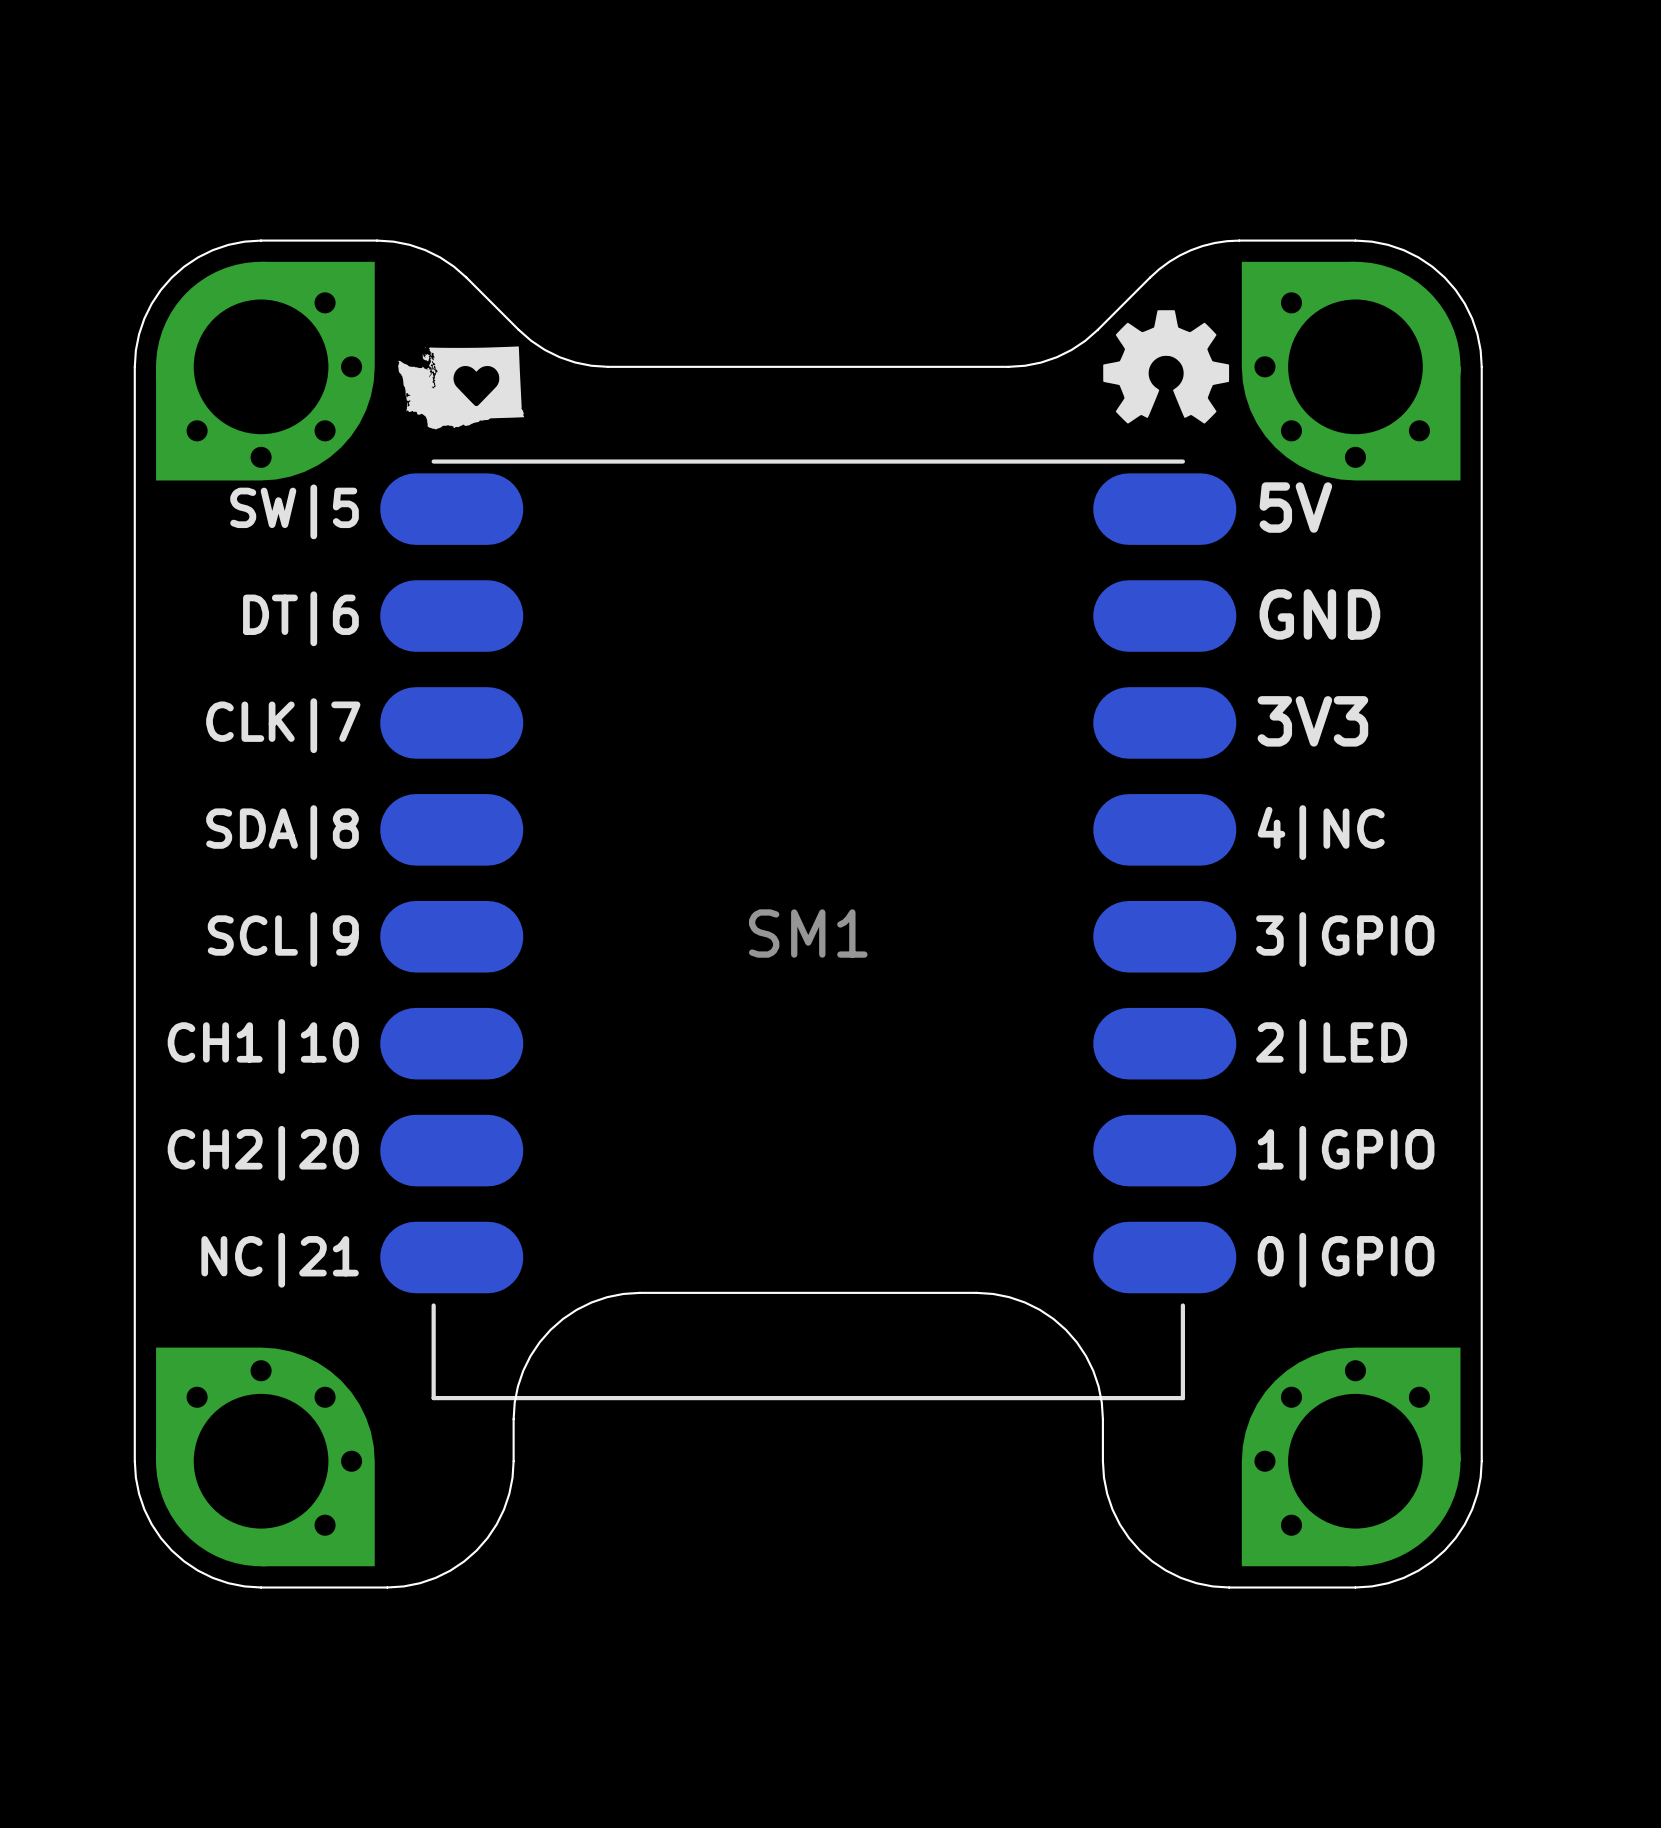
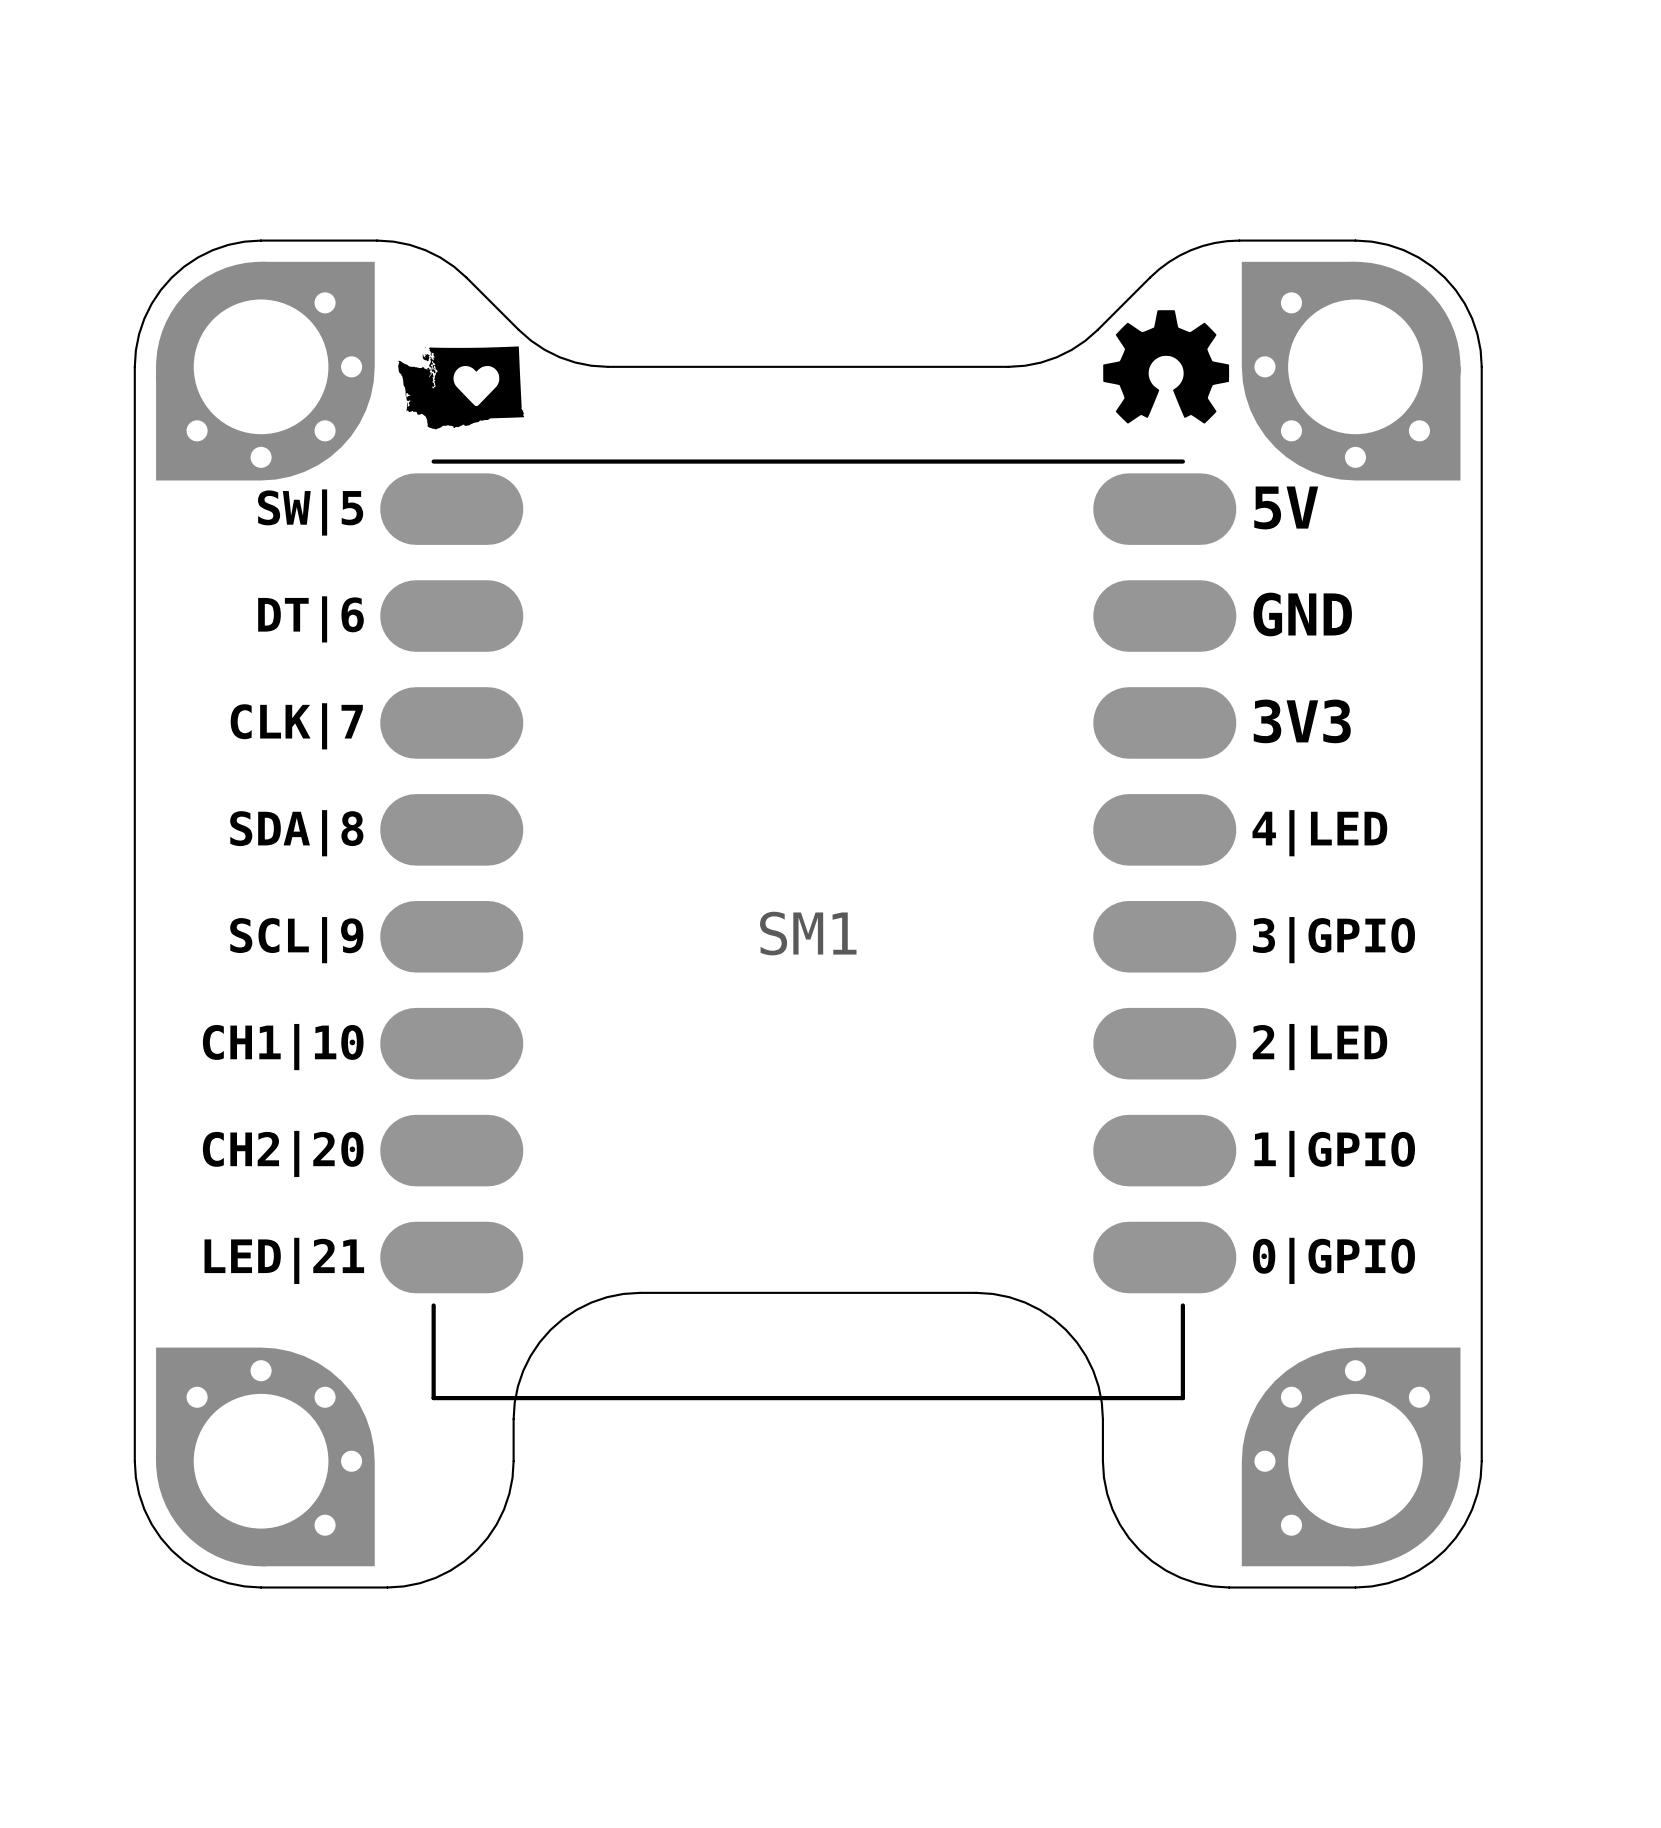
text: 4|NC (1321, 832) -> 4|LED (1319, 833)
text: NC|21 (280, 1260) -> LED|21 (284, 1260)

